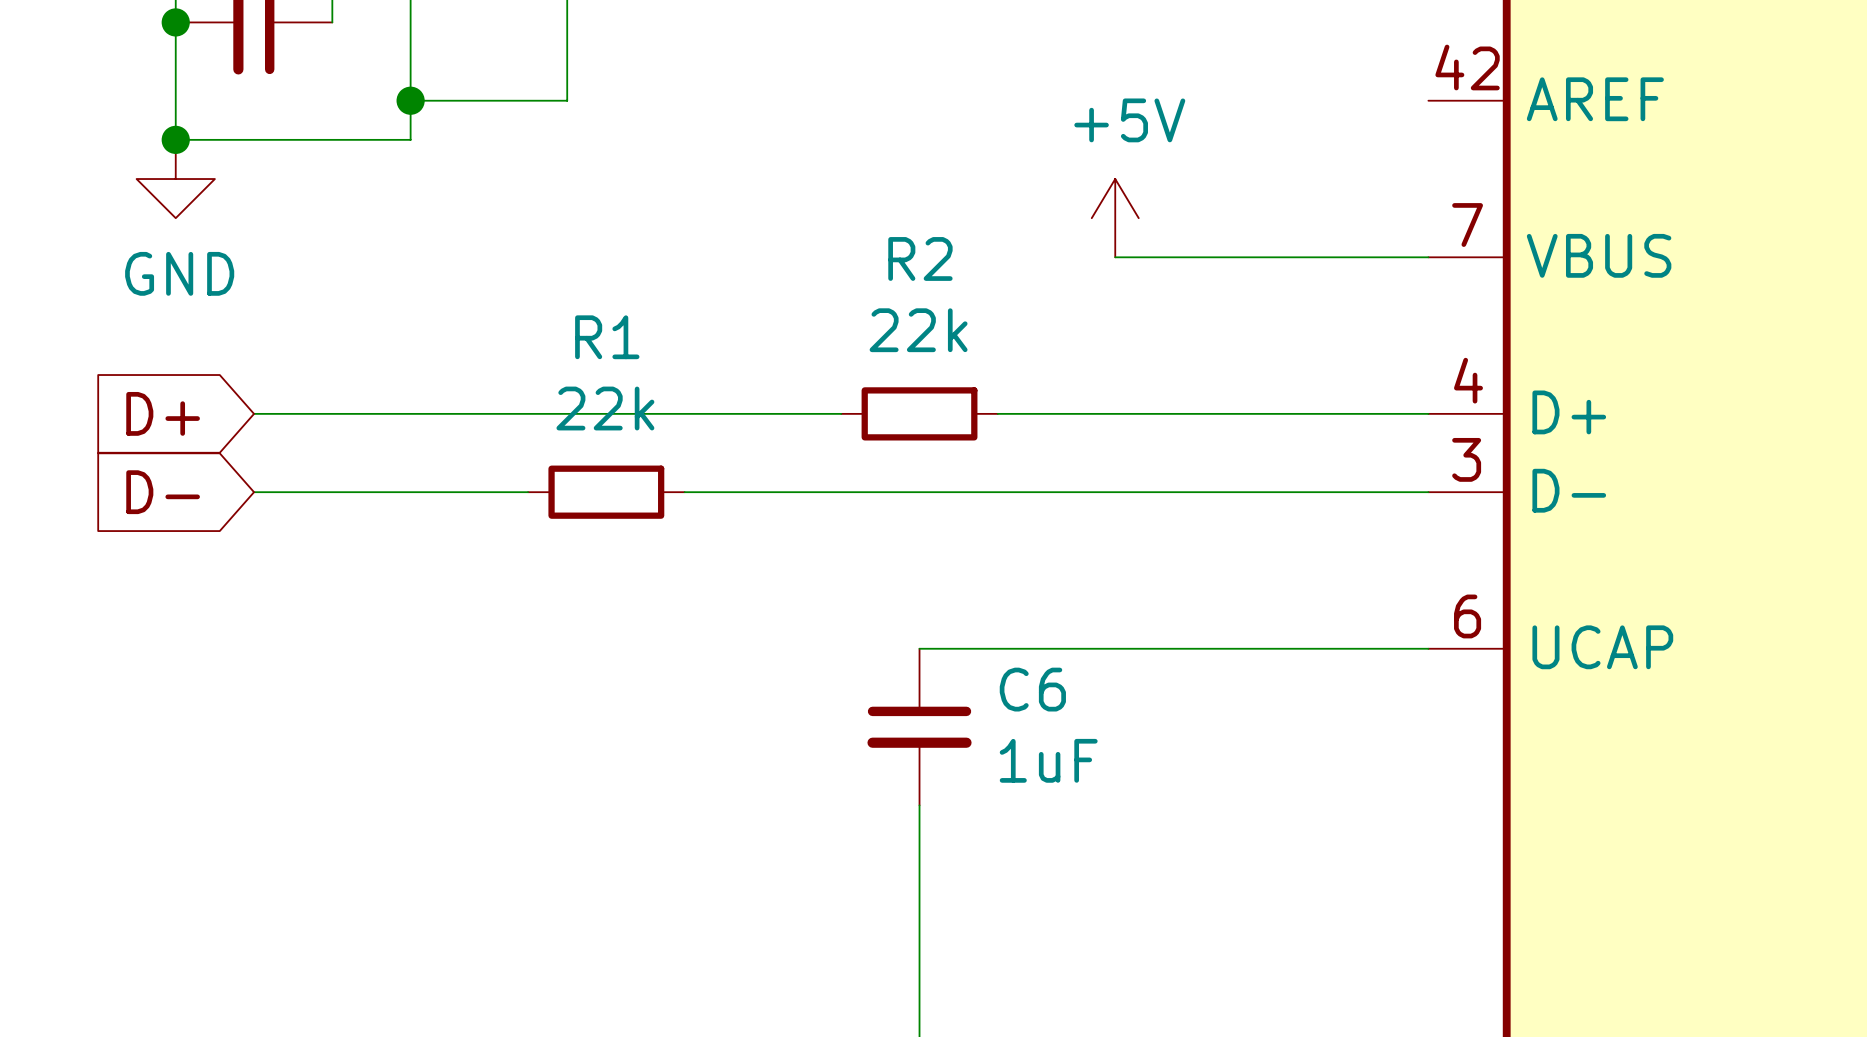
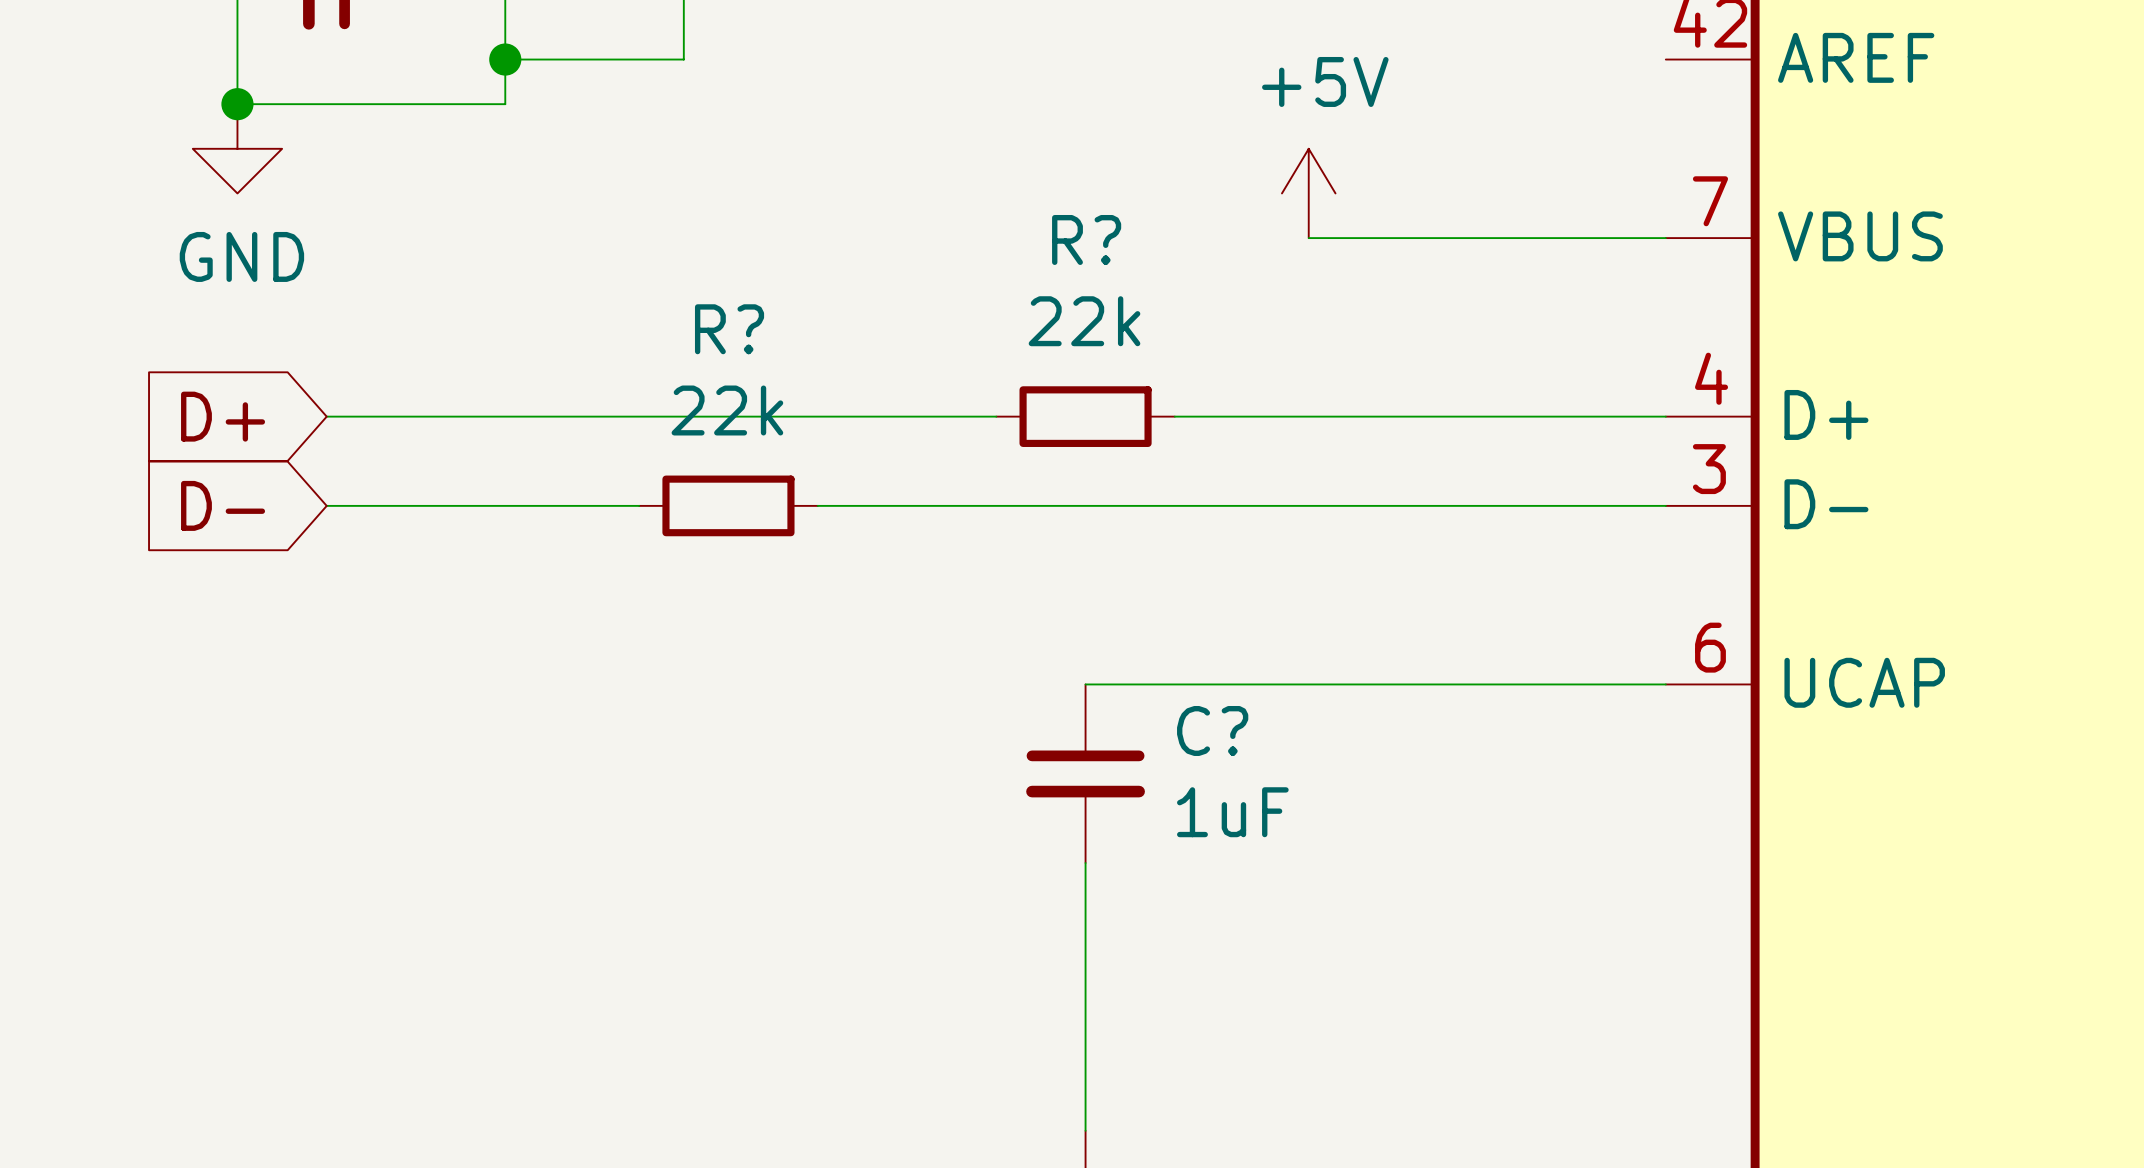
R2 name: R2 (920, 258) -> R? (1086, 239)
R1 name: R1 (607, 337) -> R? (729, 329)
C6 name: C6 (1032, 689) -> C? (1212, 730)

